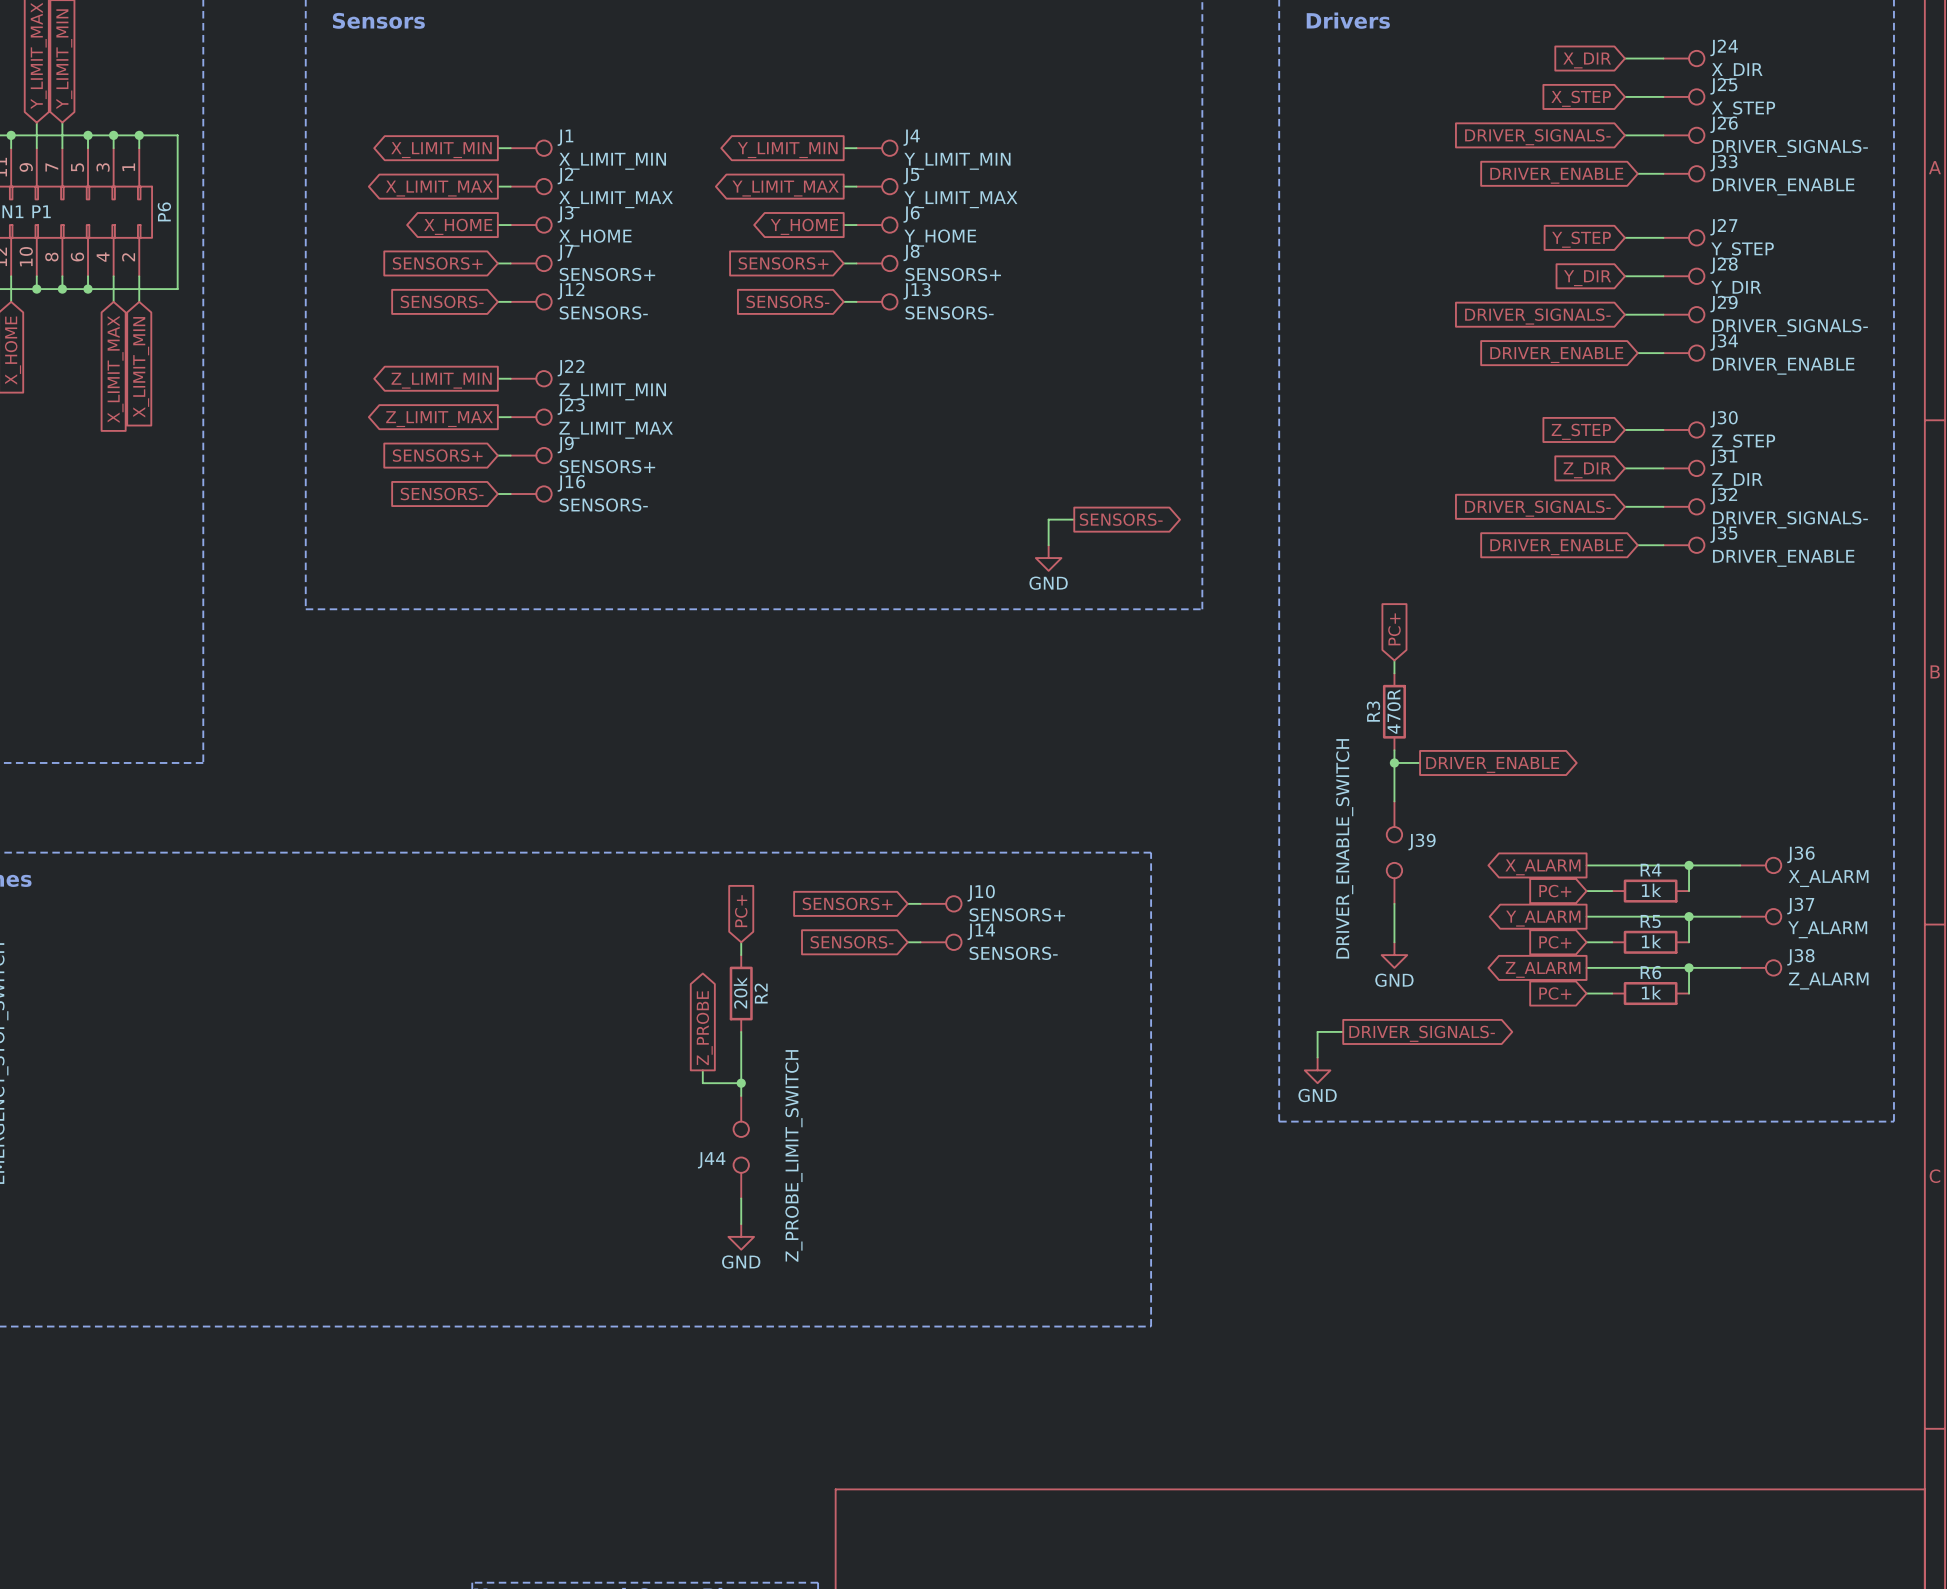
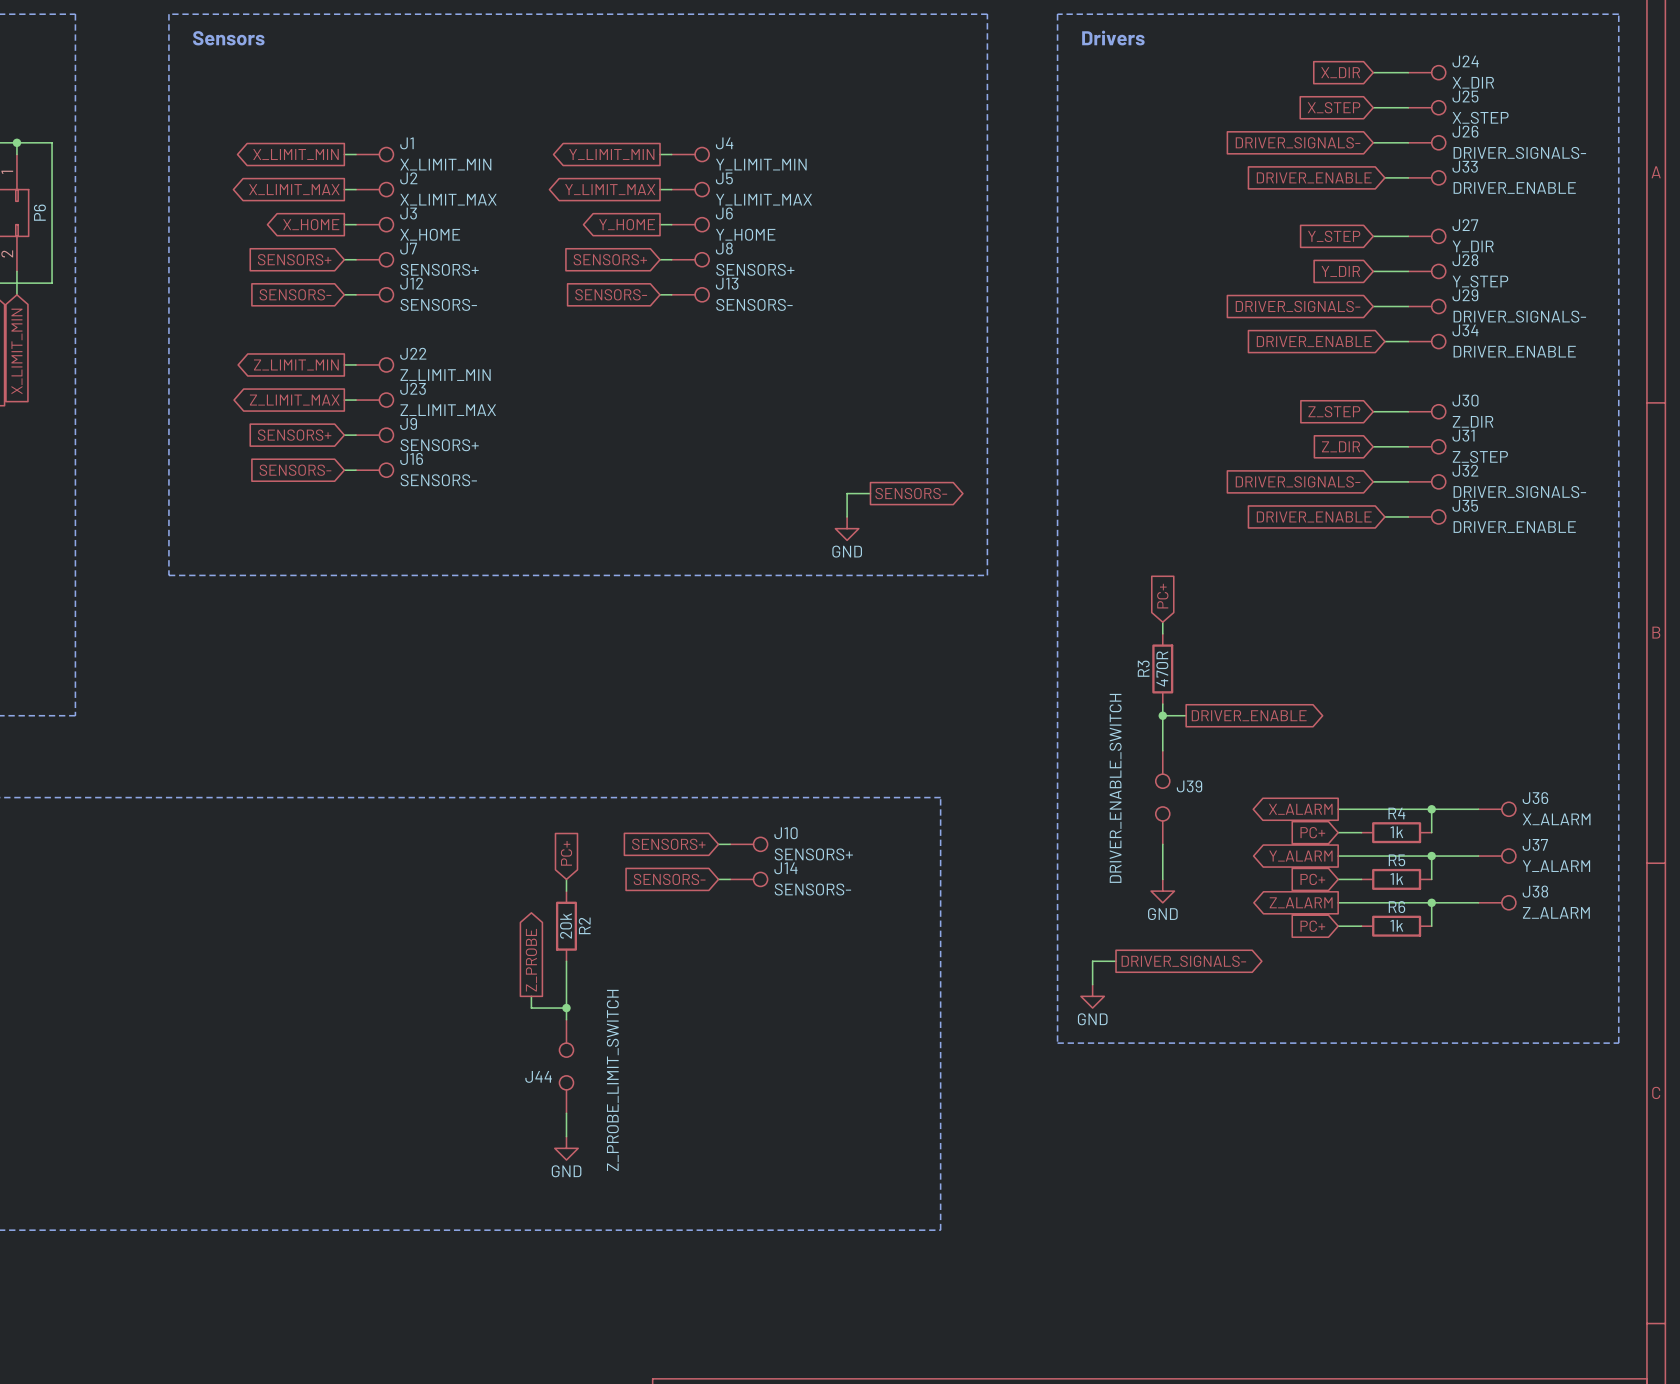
J27 value: Y_STEP (1742, 250) -> Y_DIR (1473, 246)
J28 value: Y_DIR (1736, 289) -> Y_STEP (1480, 281)
J30 value: Z_STEP (1743, 442) -> Z_DIR (1473, 421)
J31 value: Z_DIR (1737, 481) -> Z_STEP (1480, 456)

